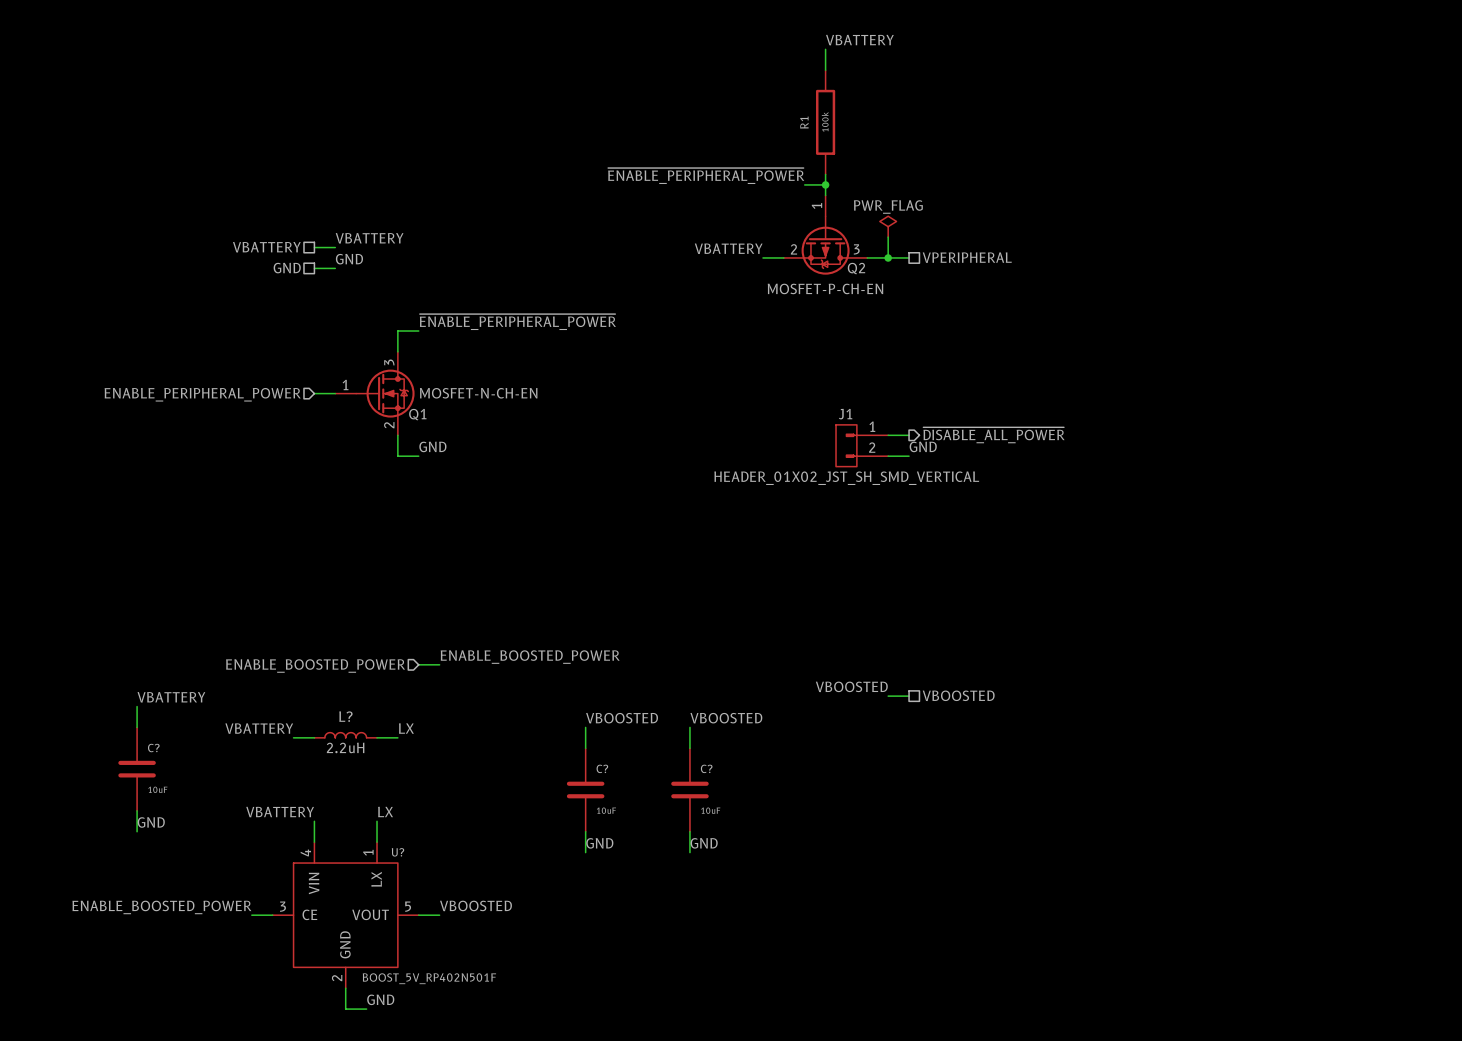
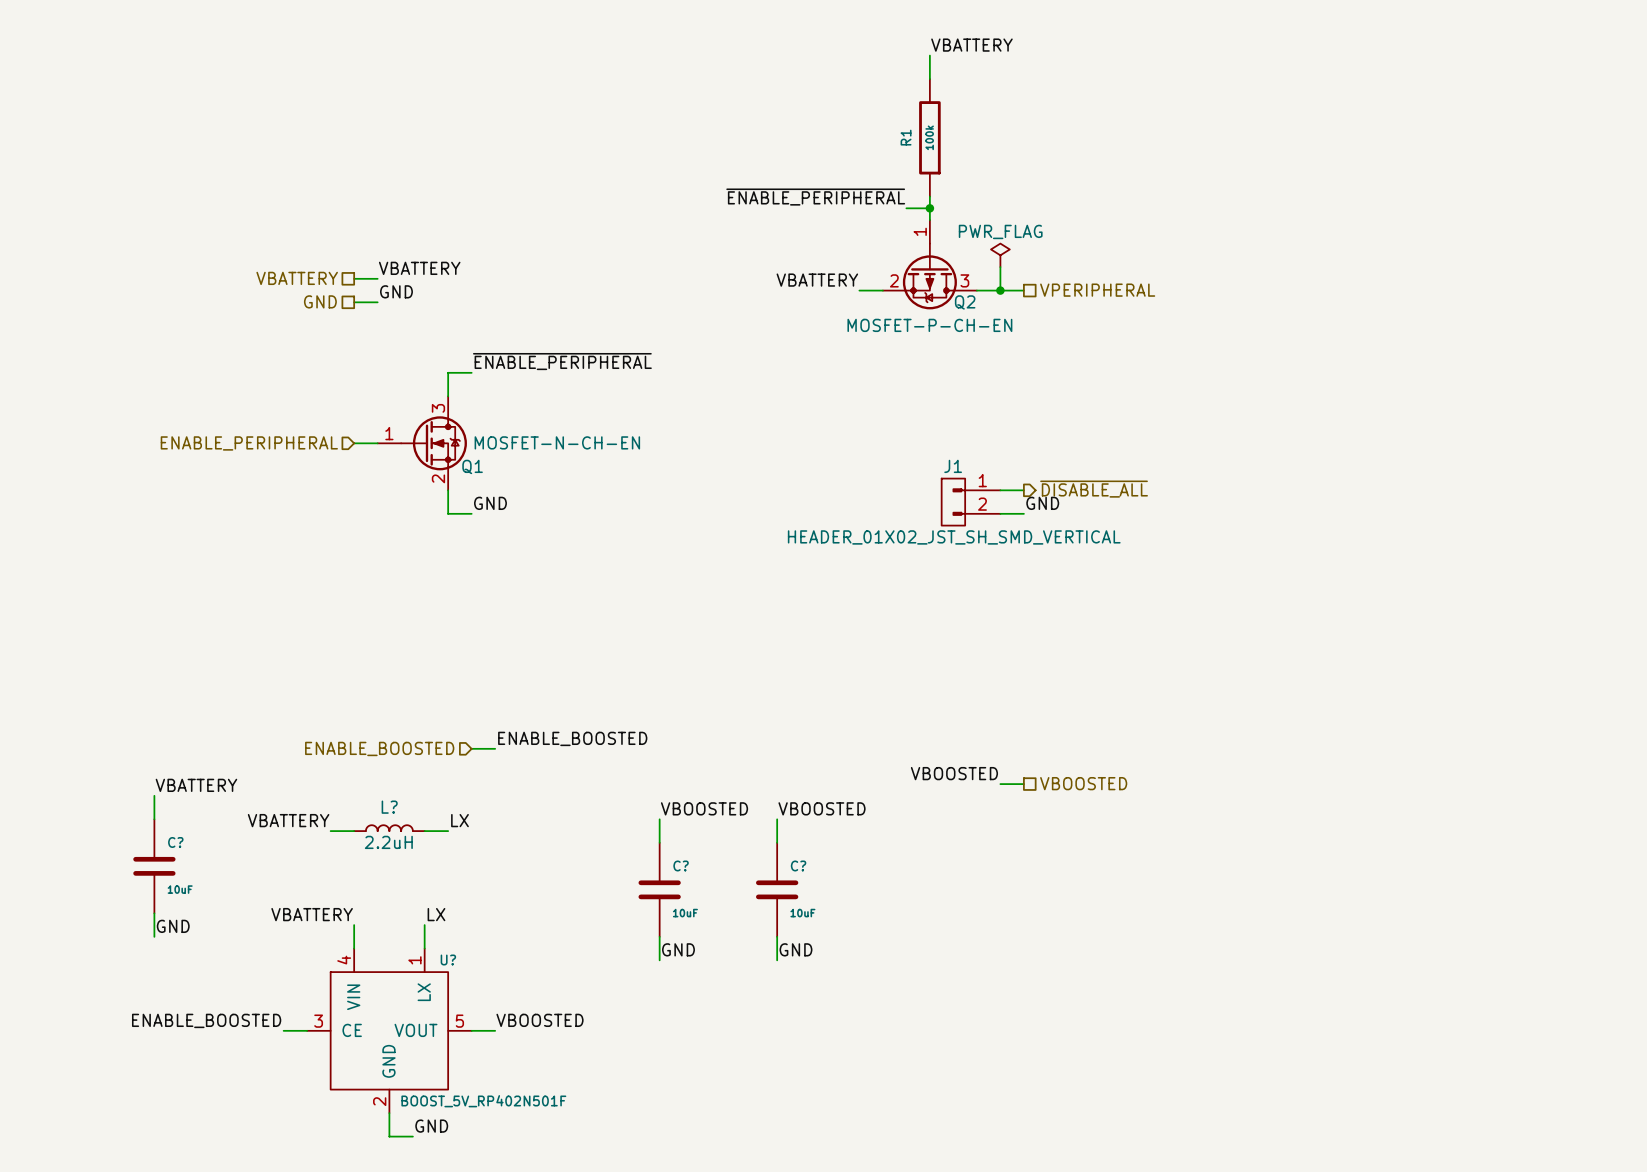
label: ~{ENABLE_PERIPHERAL_POWER} (706, 176) -> ~{ENABLE_PERIPHERAL} (815, 197)
label: ~{ENABLE_PERIPHERAL_POWER} (517, 322) -> ~{ENABLE_PERIPHERAL} (562, 361)
hierarchical label: ENABLE_PERIPHERAL_POWER (202, 394) -> ENABLE_PERIPHERAL (249, 443)
hierarchical label: ~{DISABLE_ALL_POWER} (993, 435) -> ~{DISABLE_ALL} (1094, 489)
label: ENABLE_BOOSTED_POWER (530, 657) -> ENABLE_BOOSTED (572, 738)
hierarchical label: ENABLE_BOOSTED_POWER (315, 666) -> ENABLE_BOOSTED (379, 748)
label: ENABLE_BOOSTED_POWER (161, 907) -> ENABLE_BOOSTED (206, 1020)

